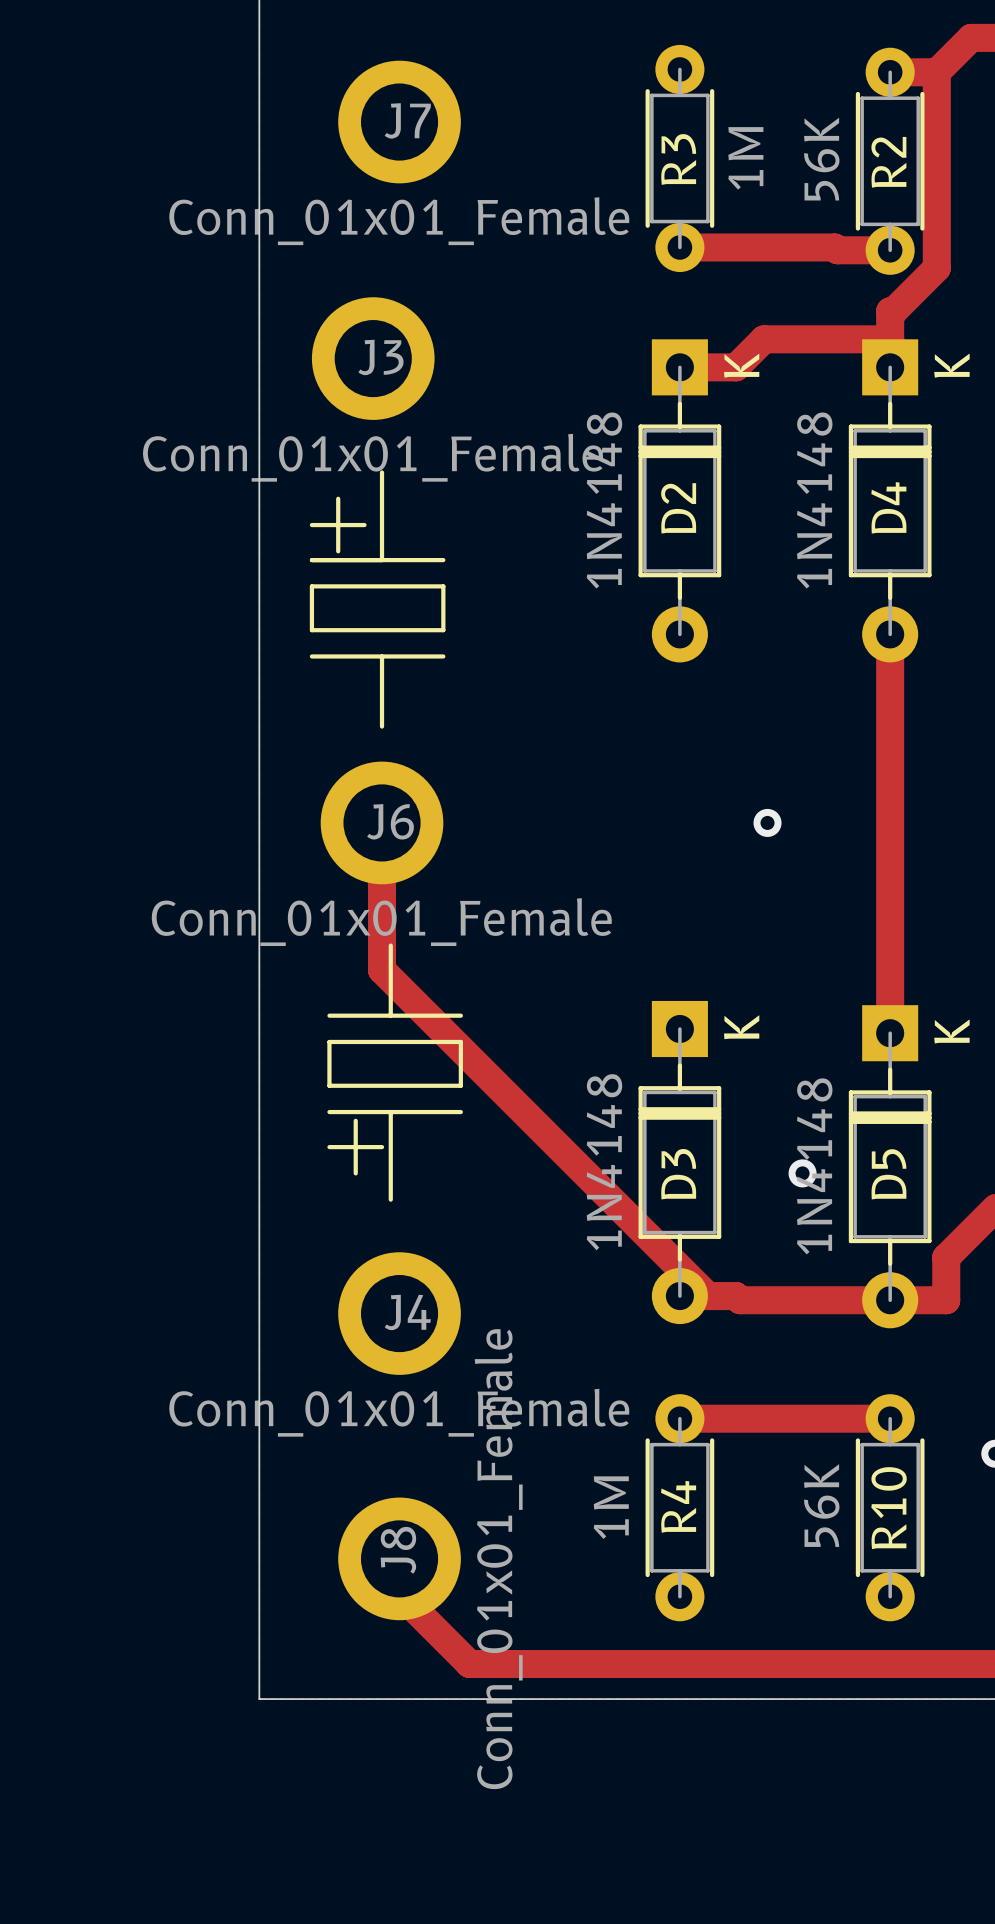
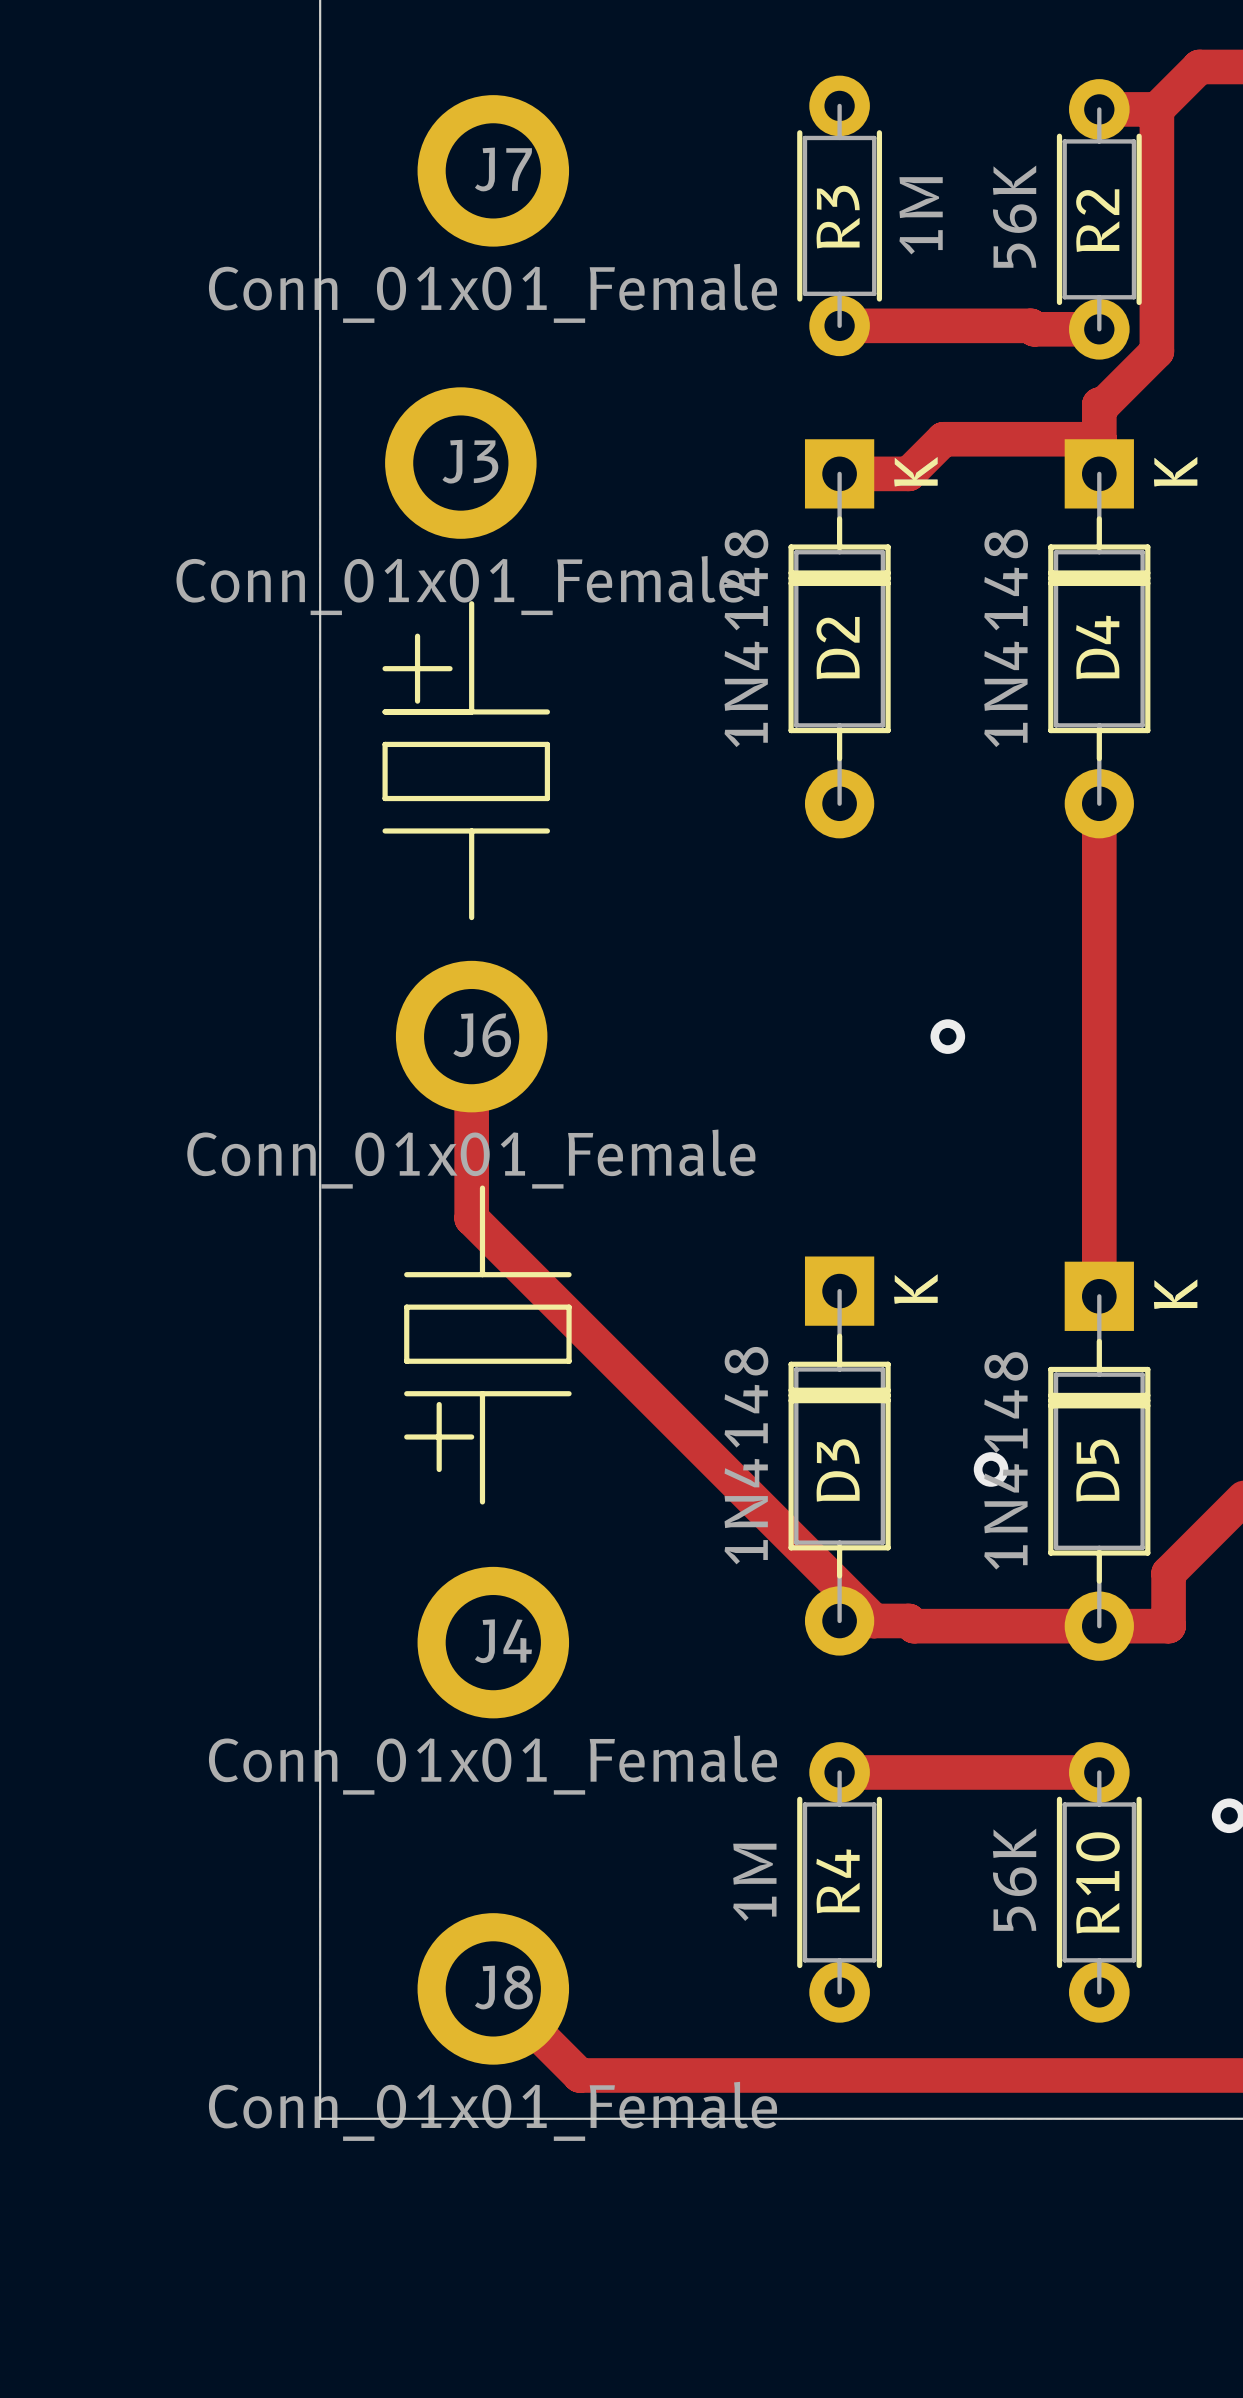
J8 name rotation: 0° (398, 1550) -> 90° clockwise (503, 1987)
J8 position: (399, 1558) -> (493, 1988)
J8 value rotation: 0° (498, 1559) -> 90° clockwise (493, 2111)

